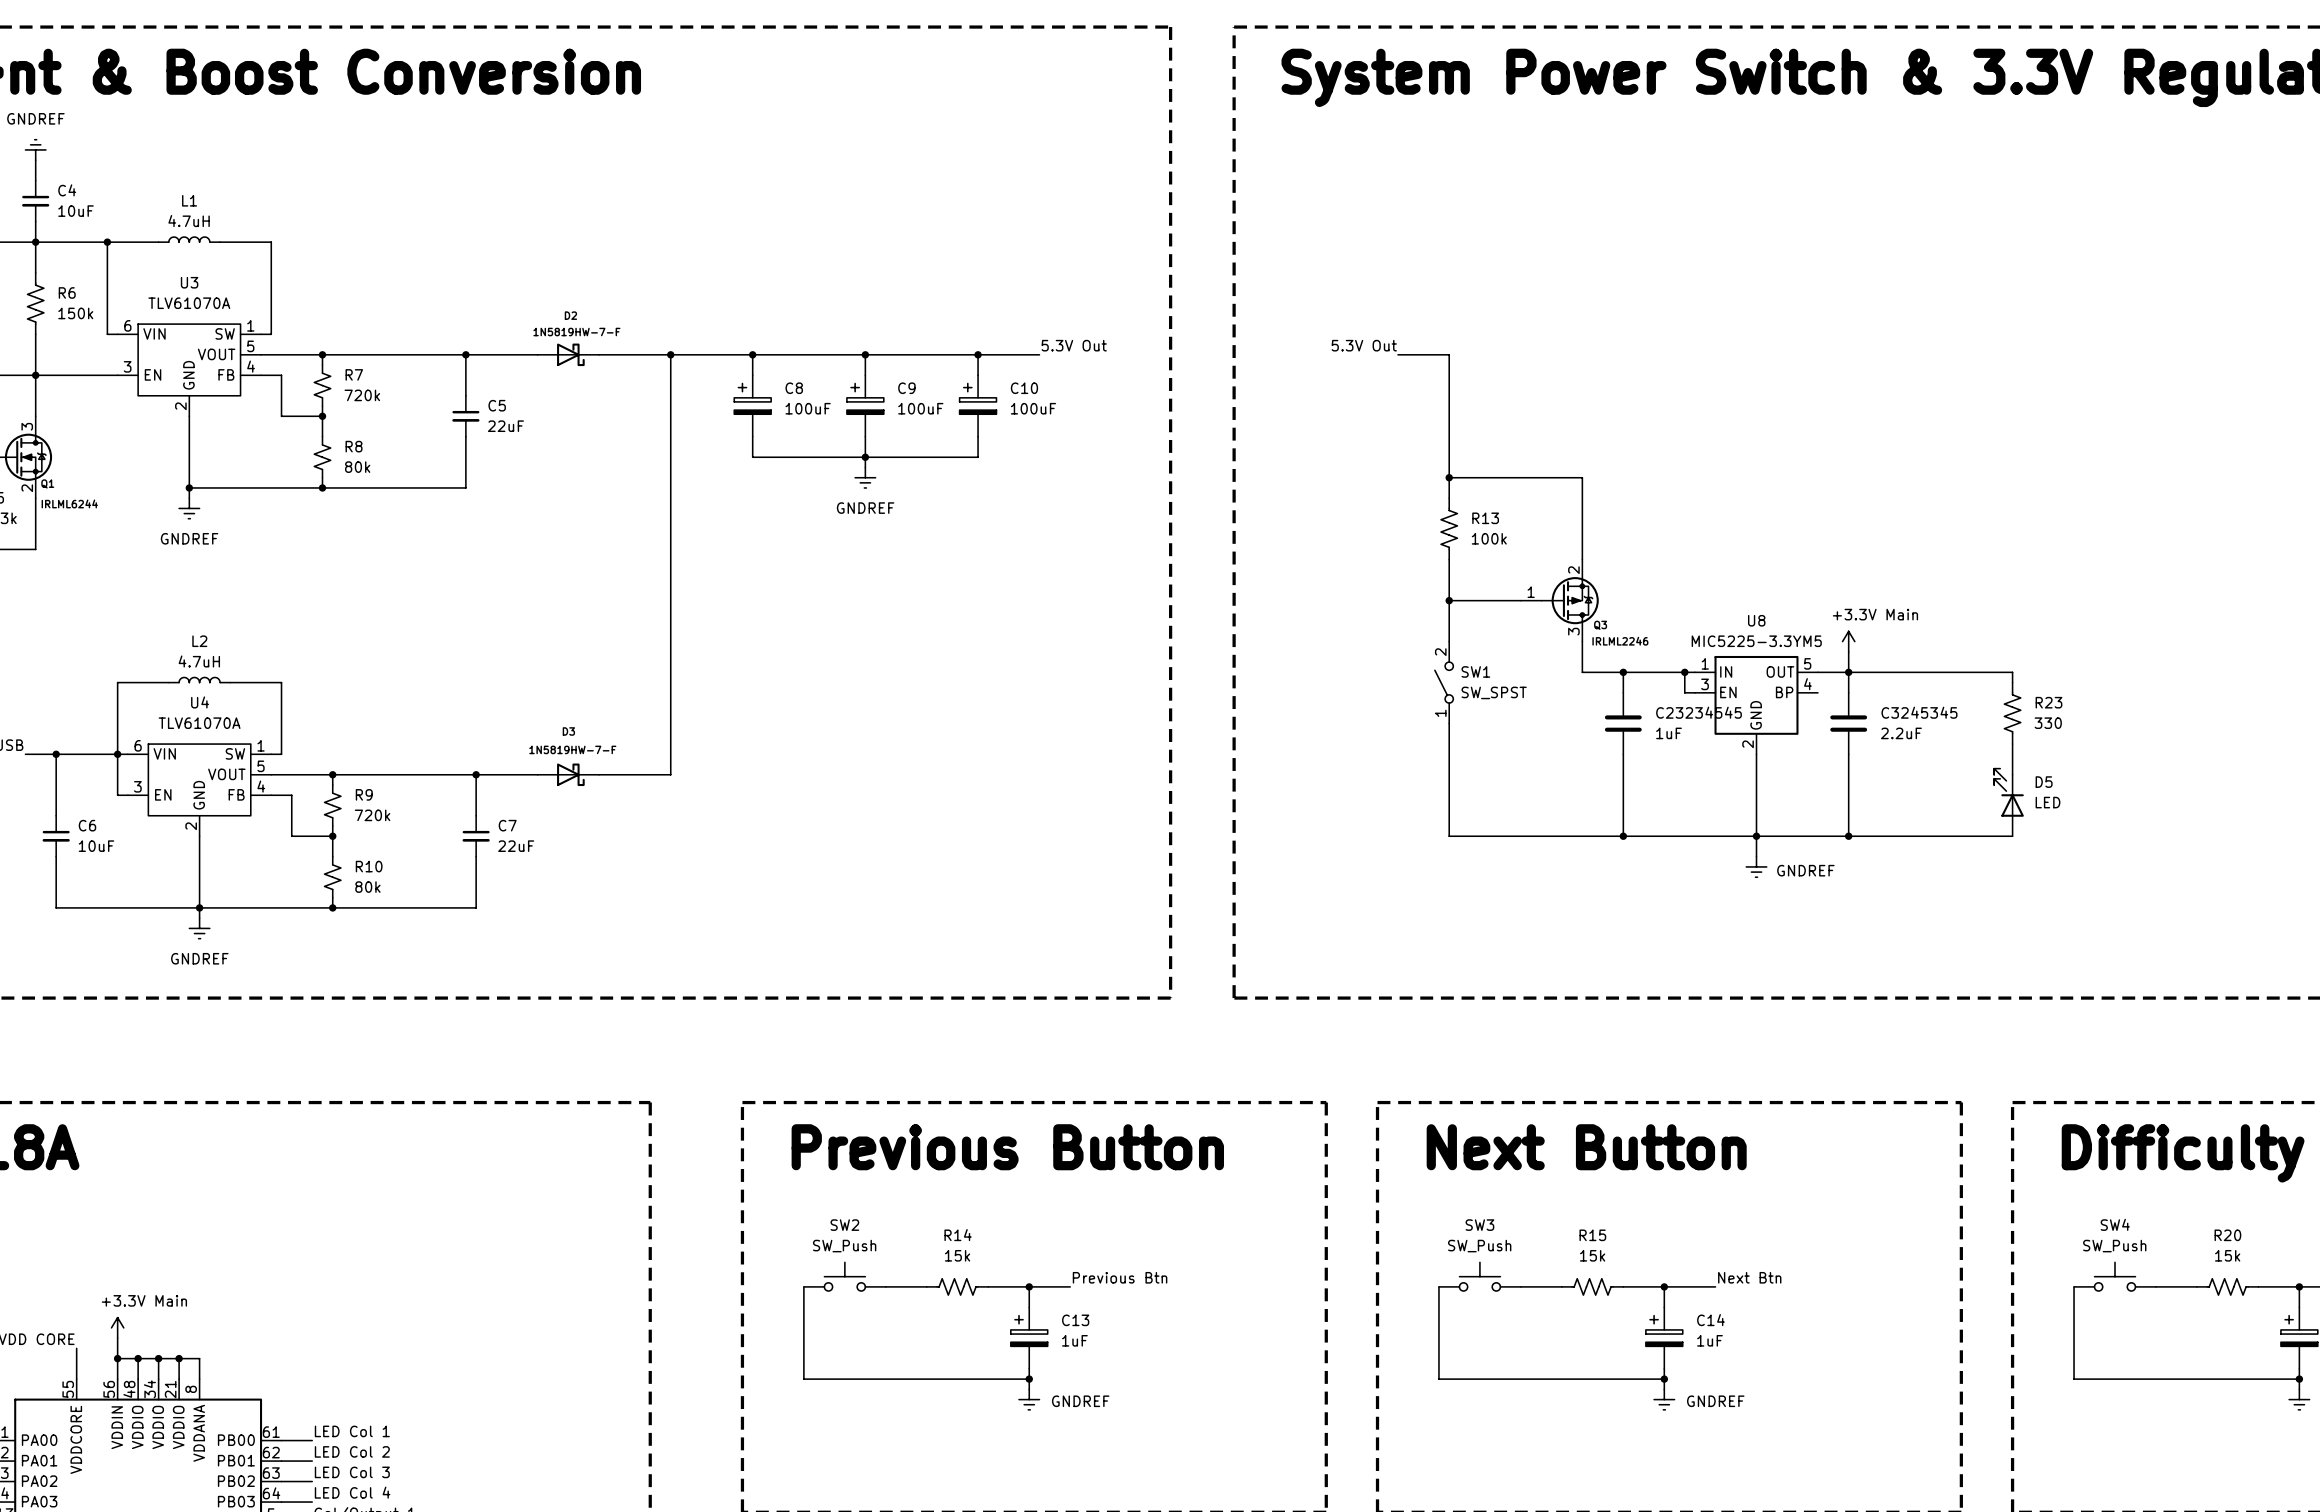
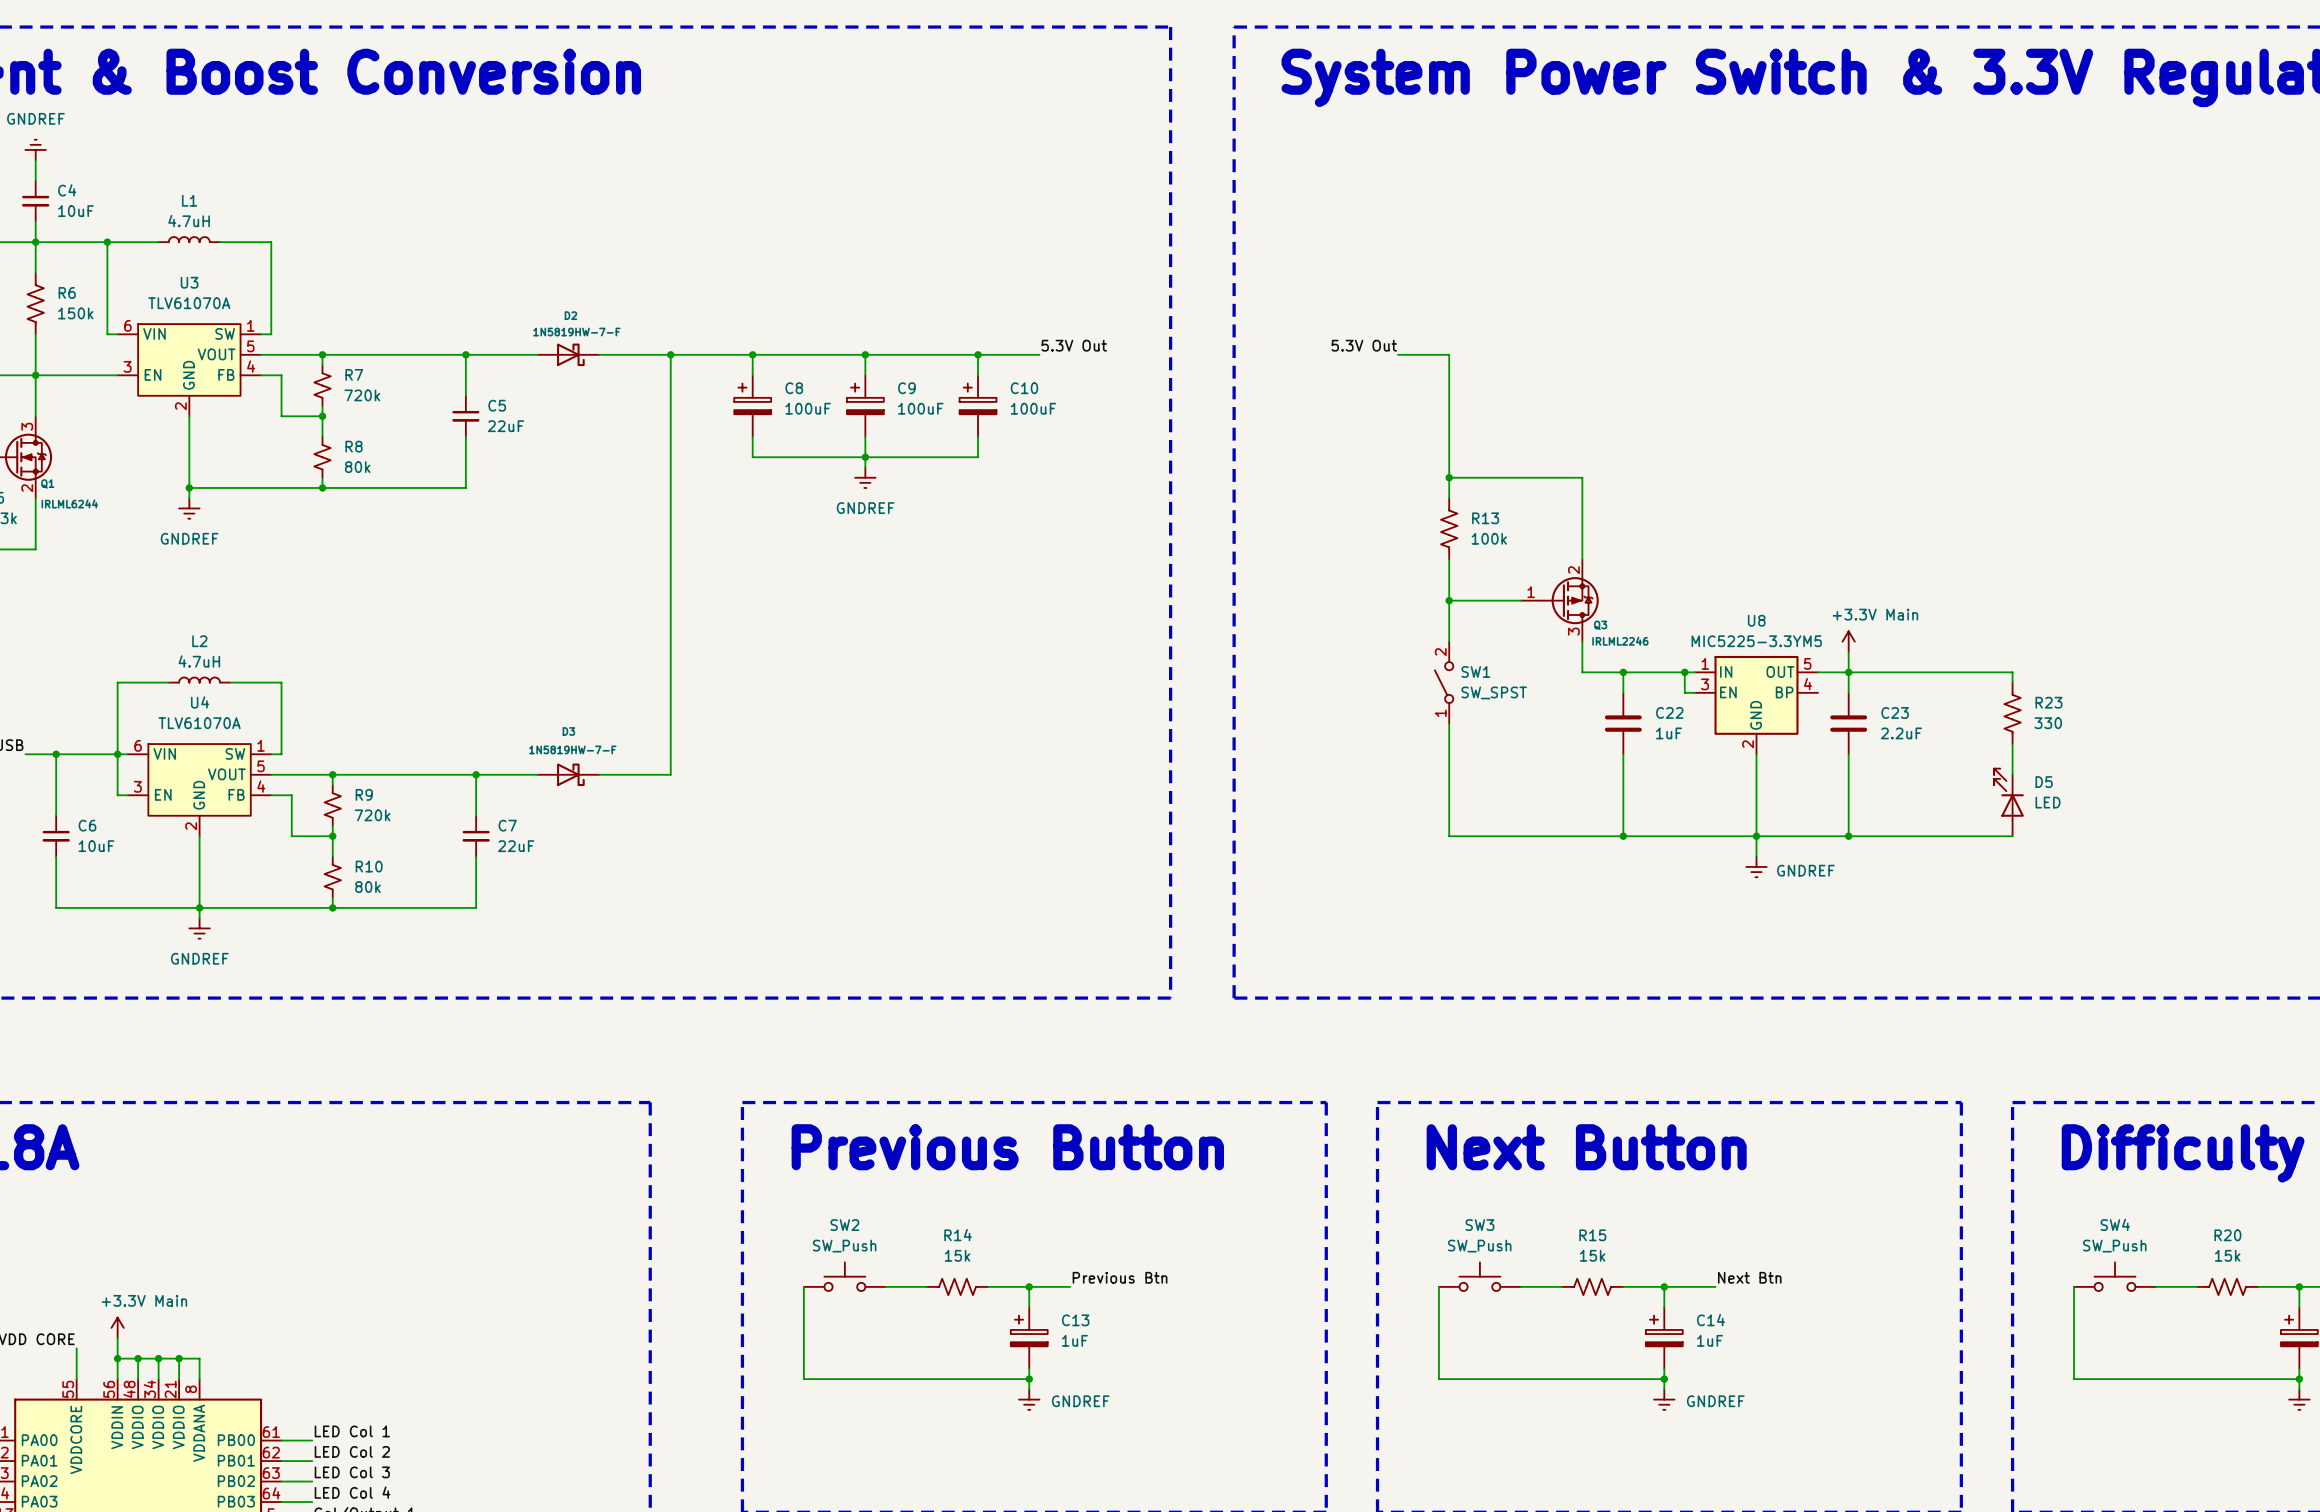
C23234545 name: C23234545 (1699, 712) -> C22 (1669, 712)
C3245345 name: C3245345 (1919, 712) -> C23 (1895, 712)

